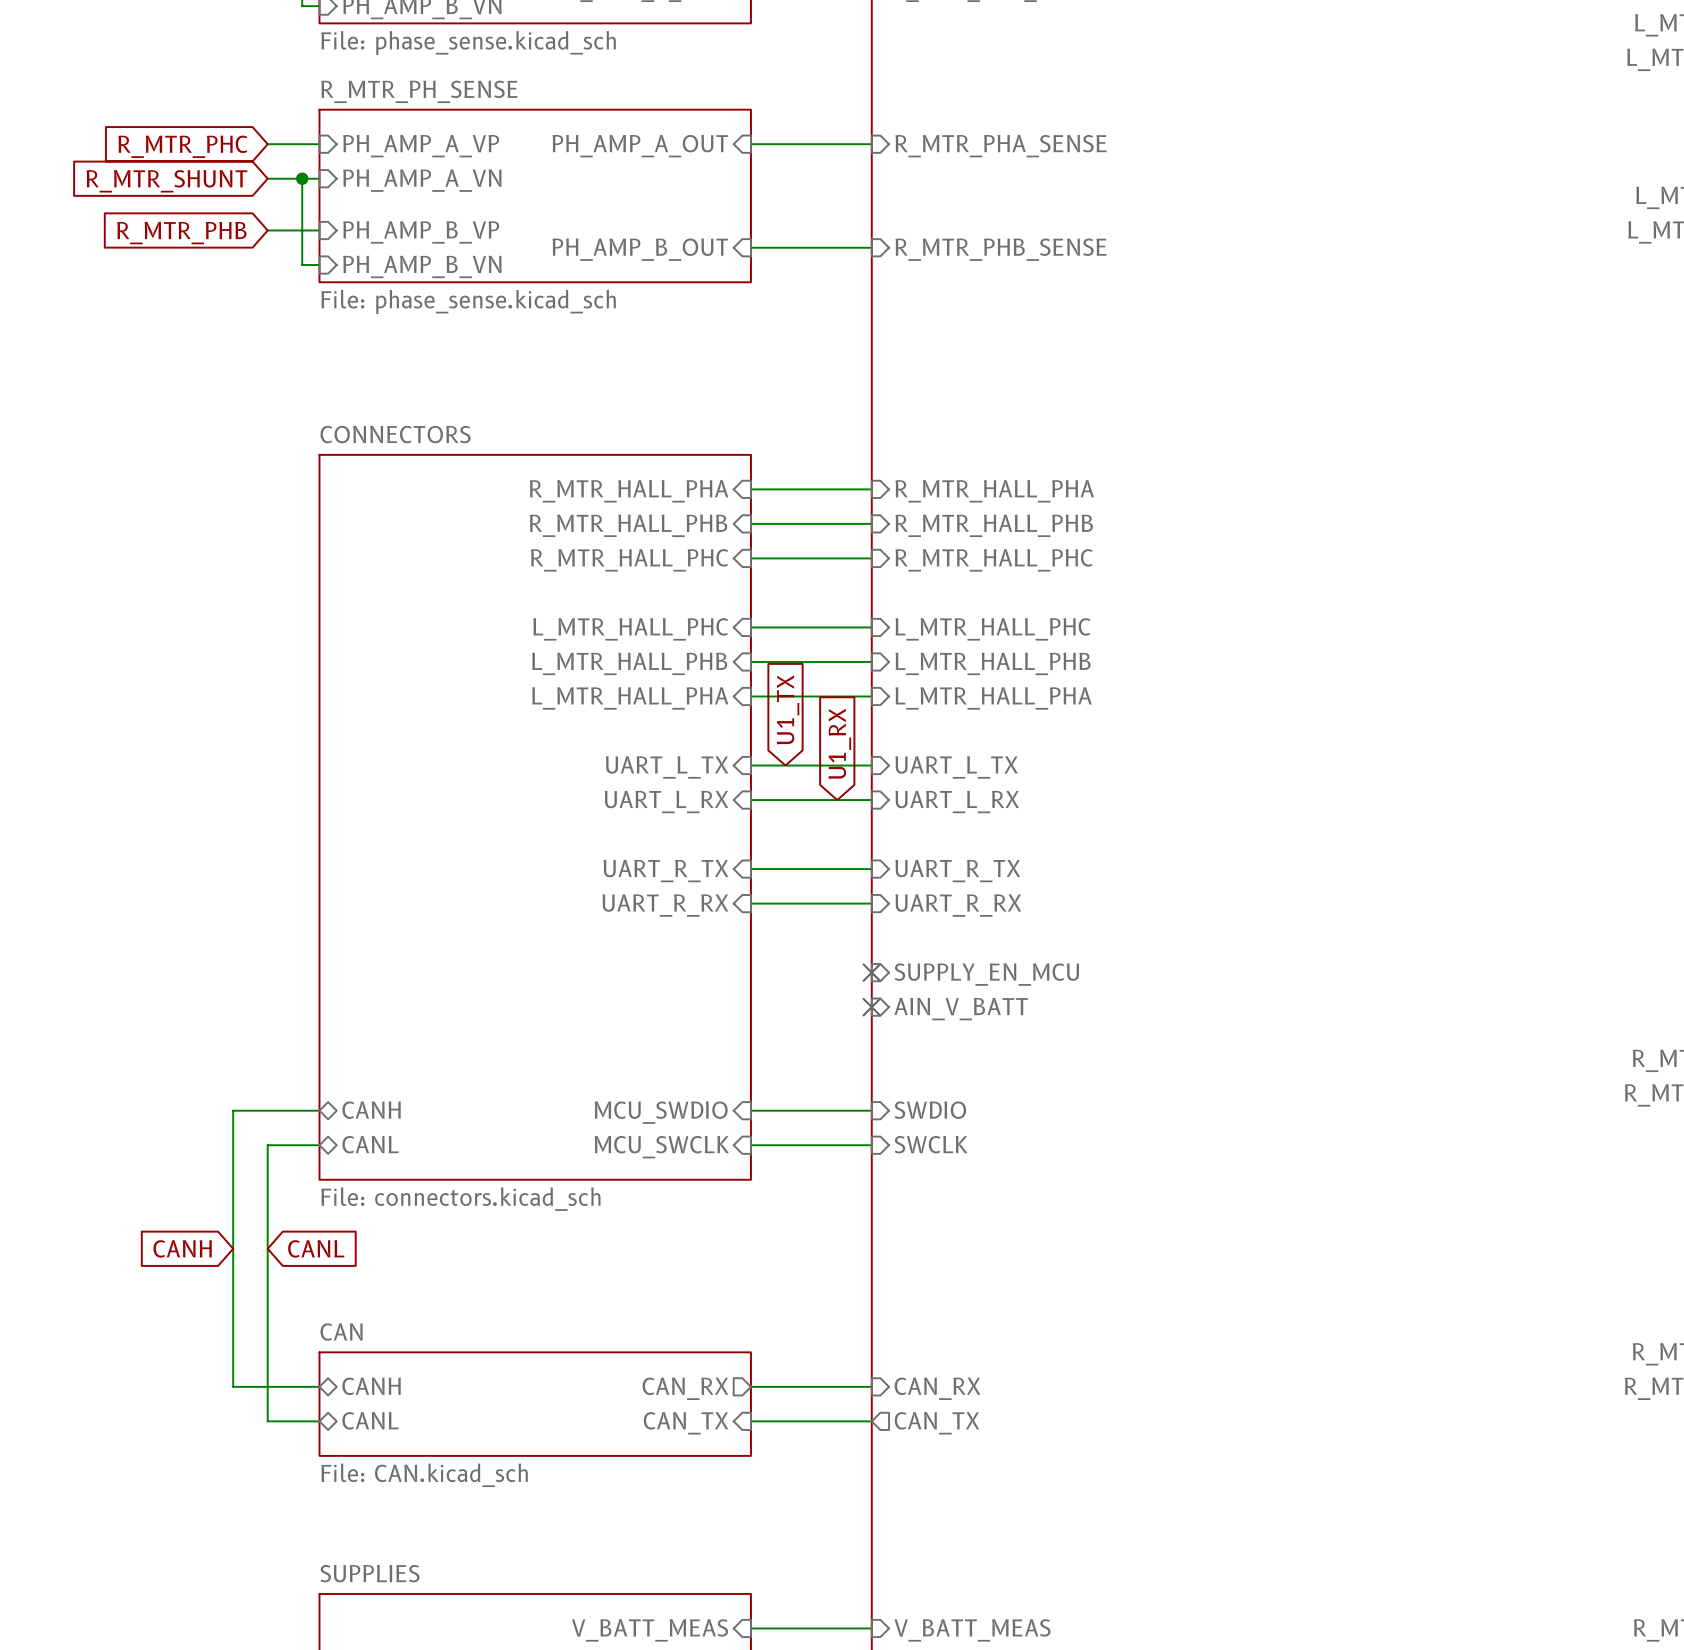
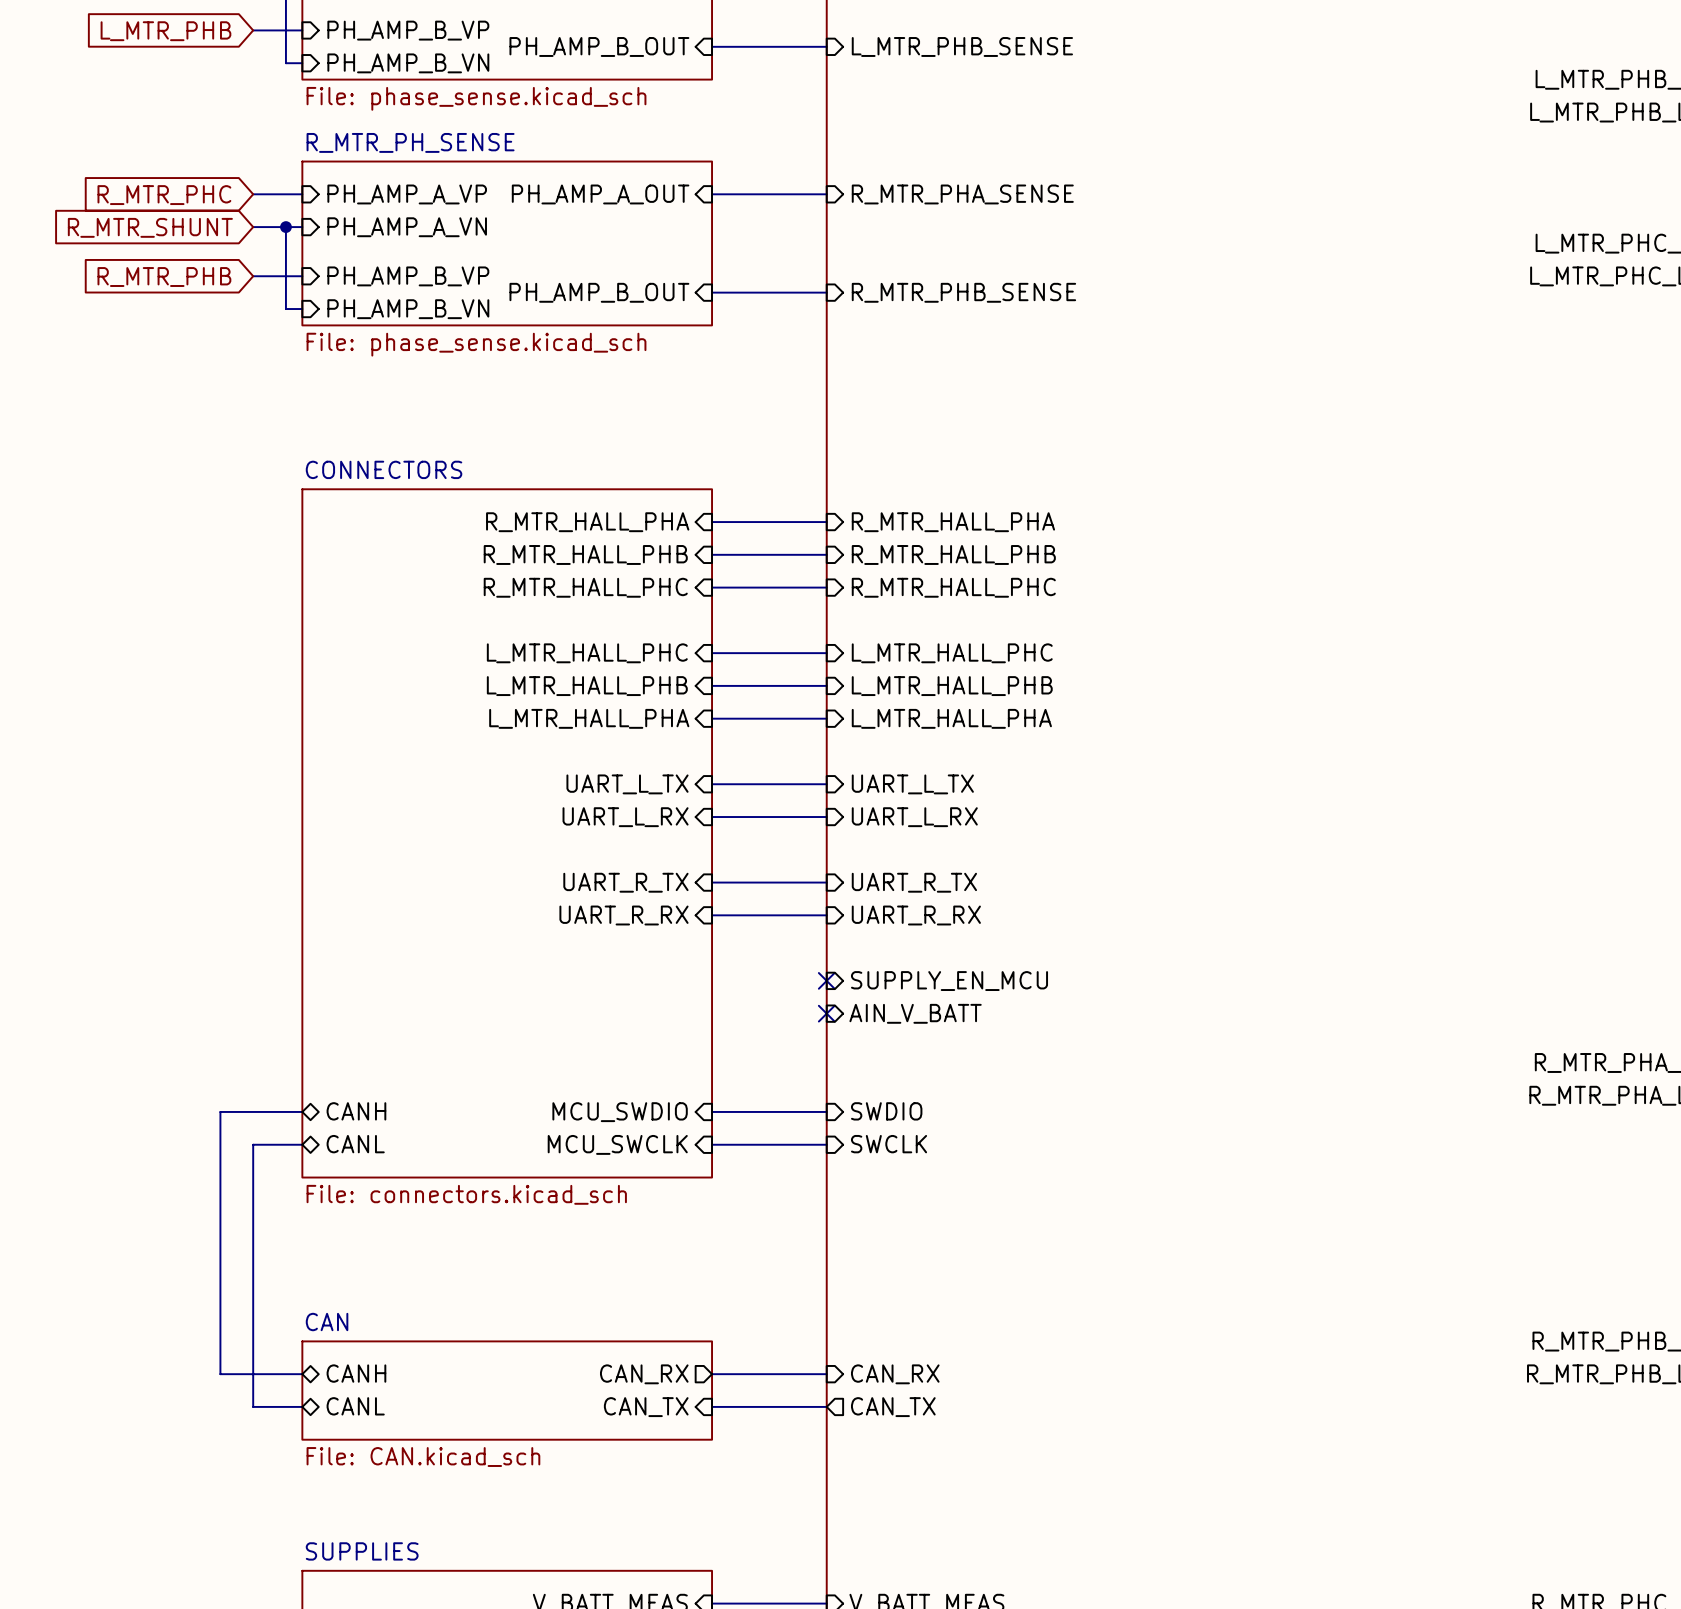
global label: U1_TX (788, 709) -> none
global label: U1_RX (839, 743) -> none
global label: CANH (182, 1248) -> none
global label: CANL (316, 1248) -> none

